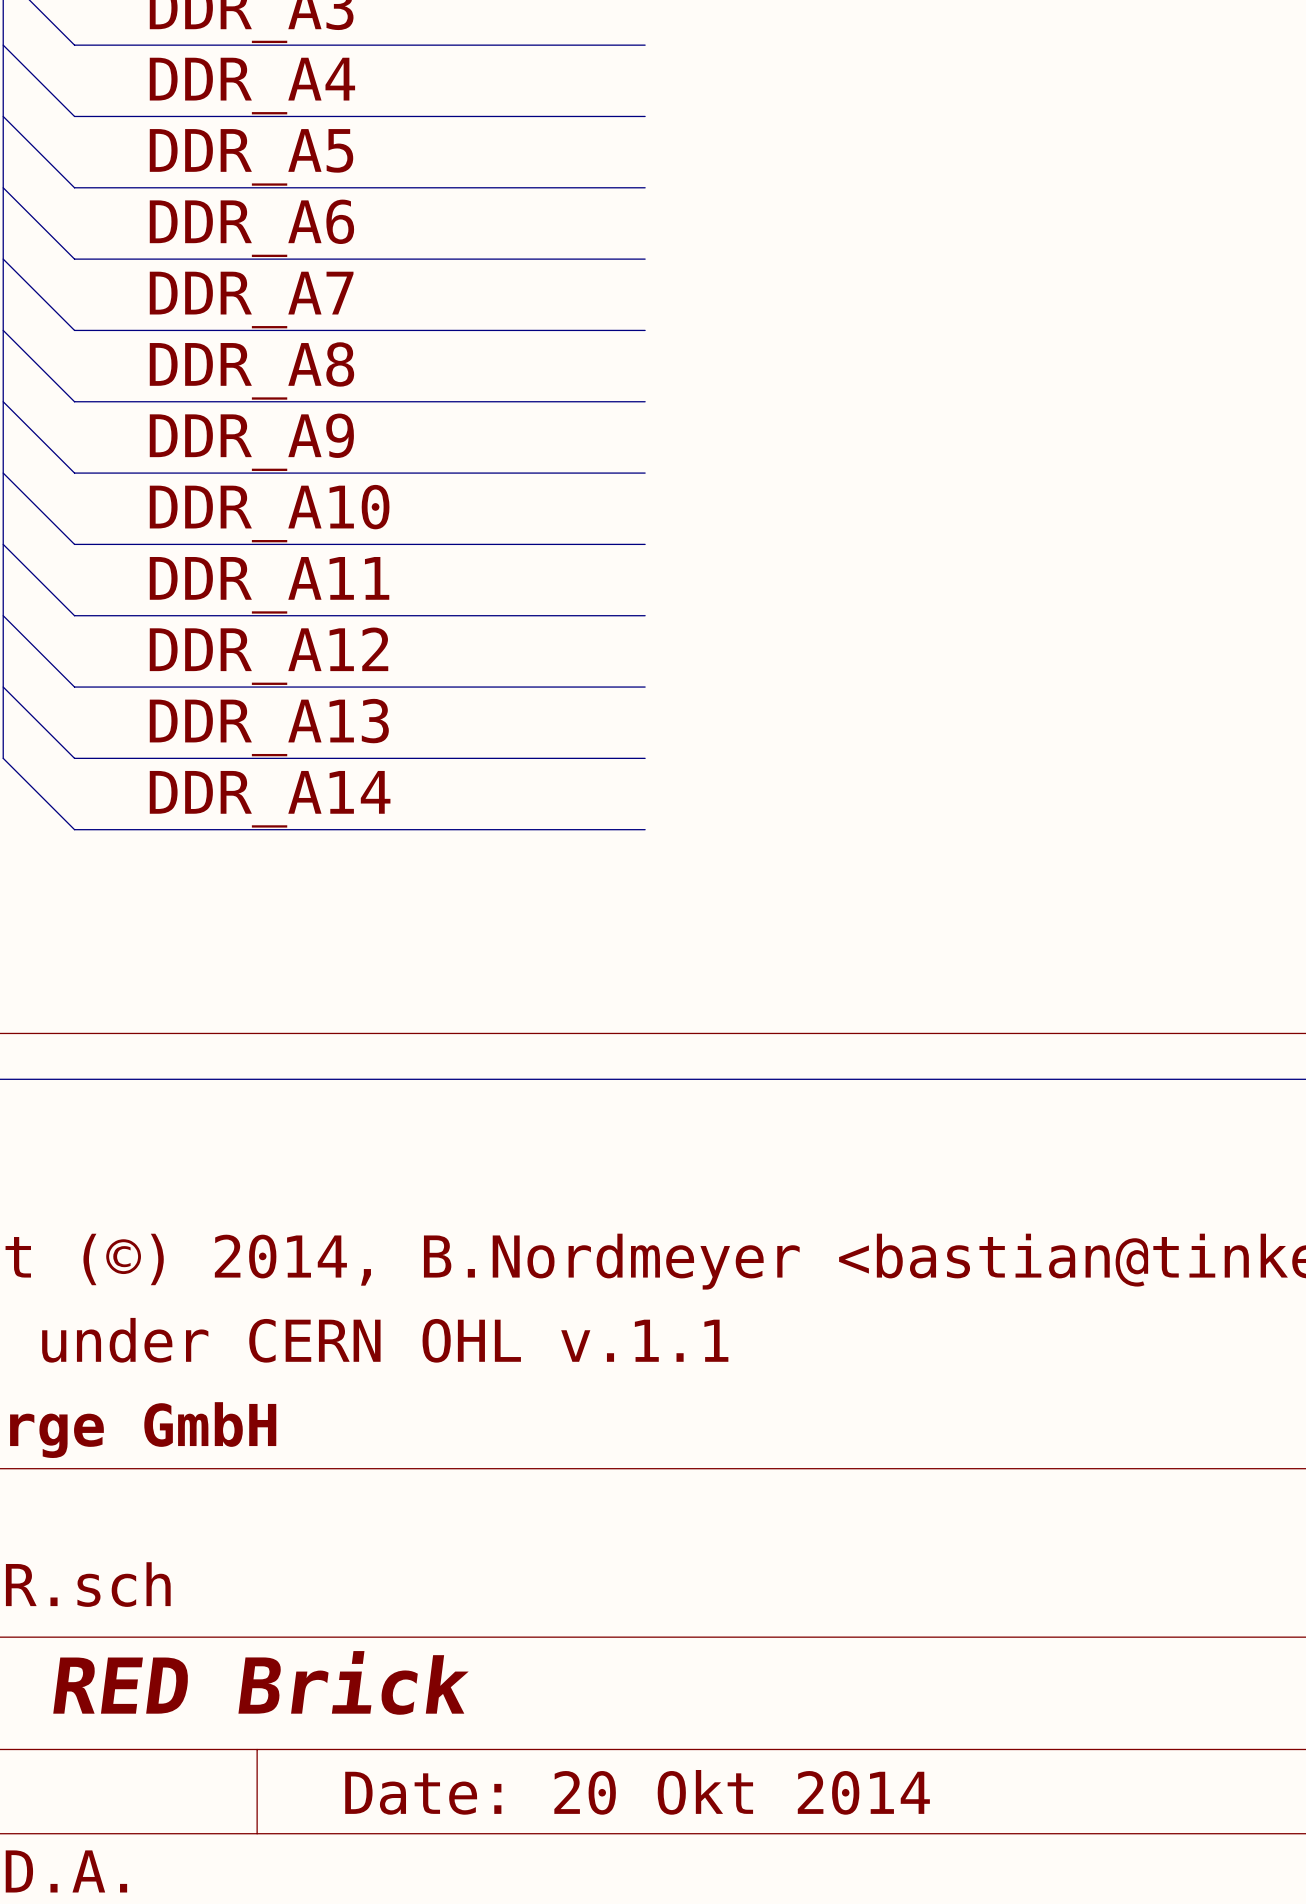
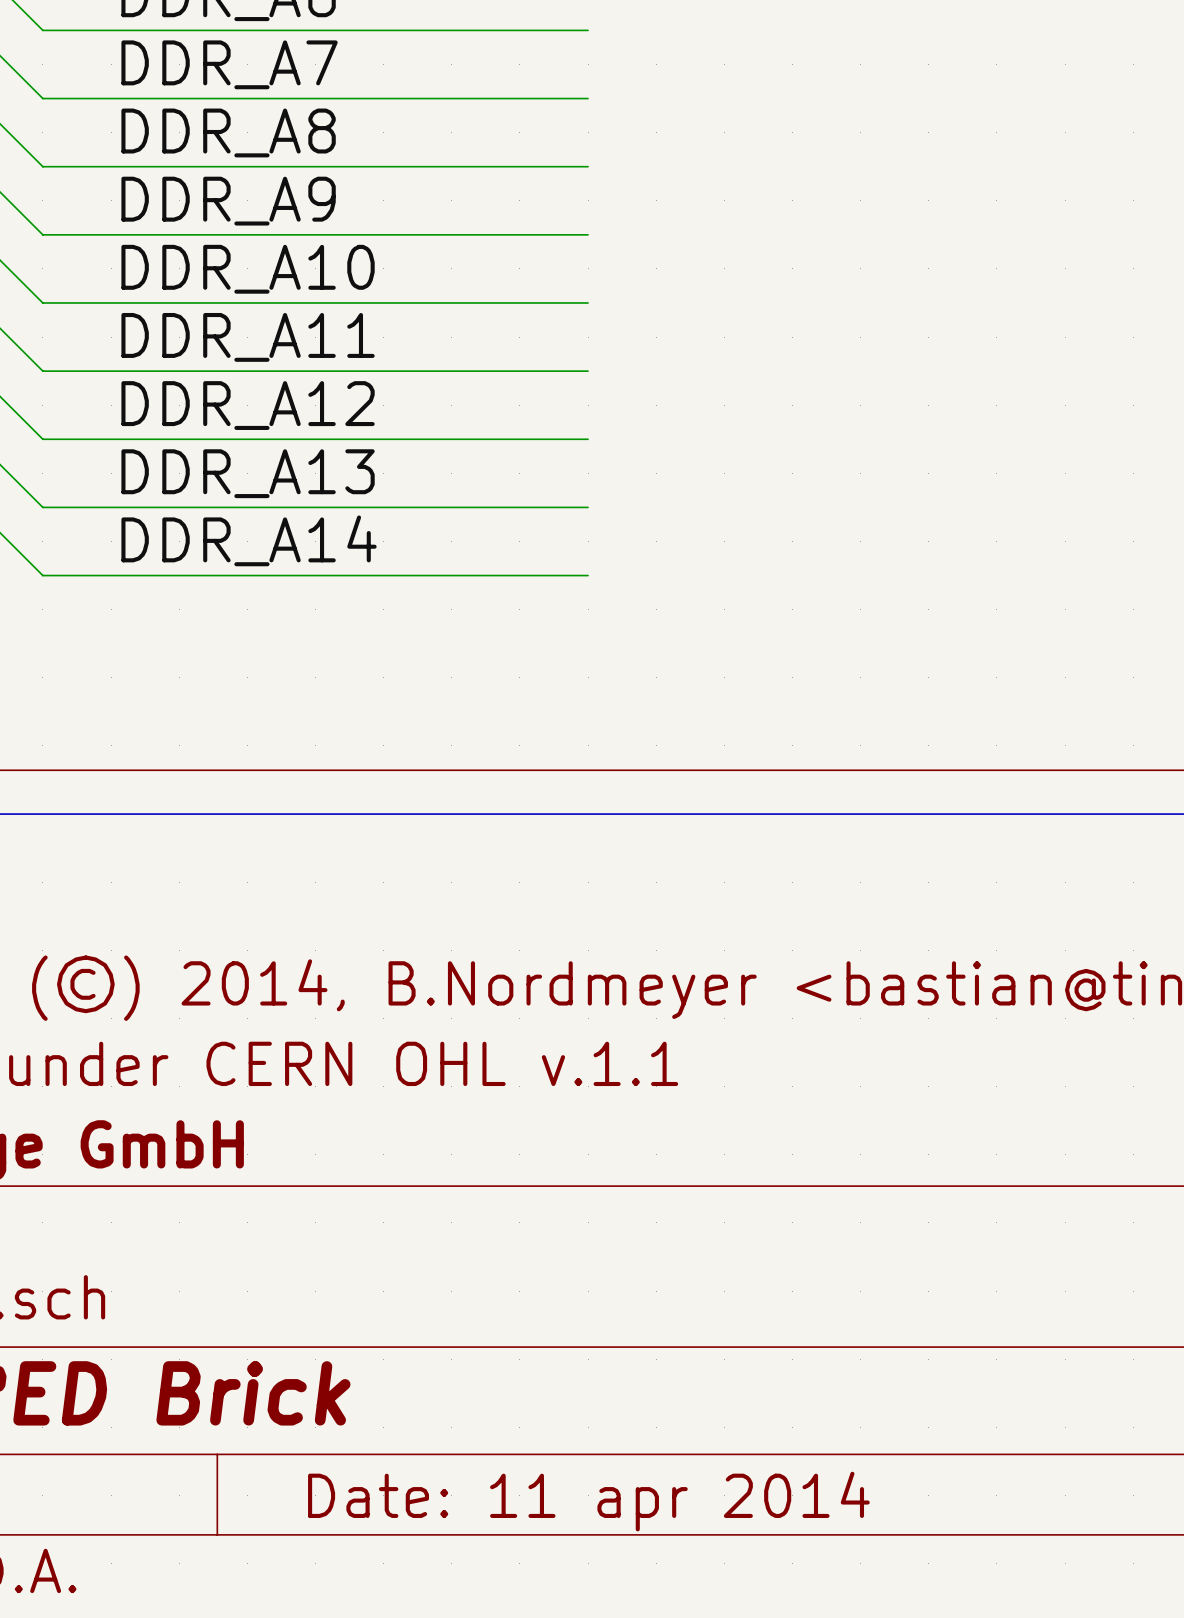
title block: Date: 20 Okt 2014 (637, 1792) -> Date: 11 apr 2014 (588, 1501)

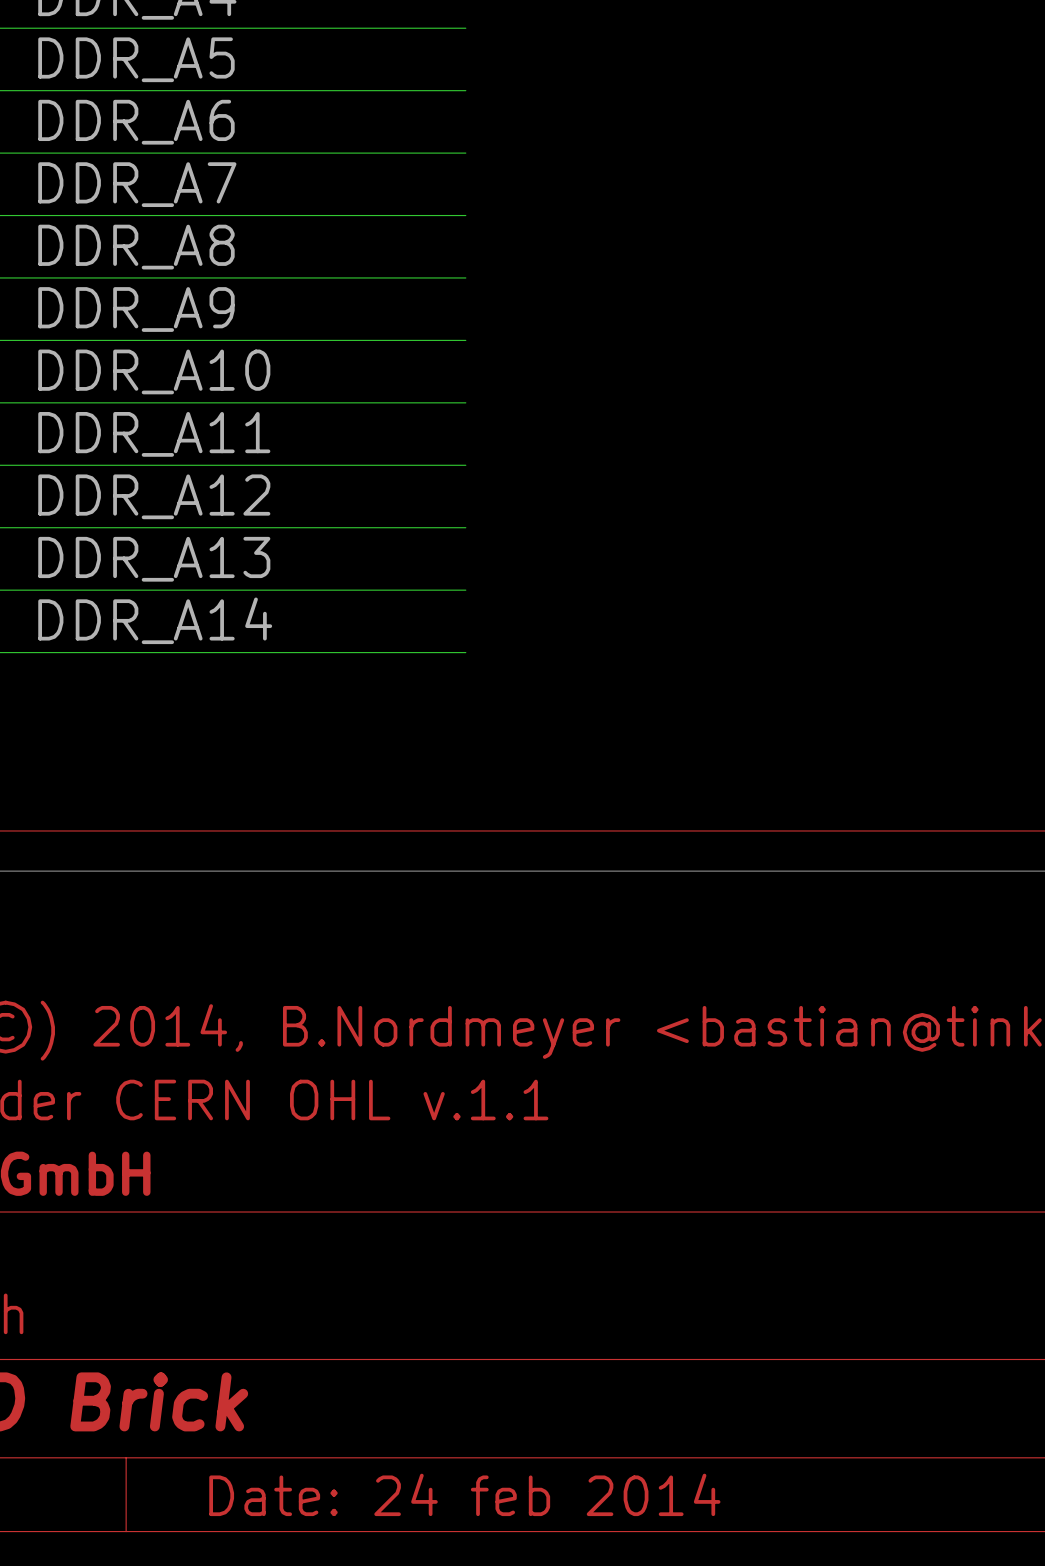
title block: Date: 11 apr 2014 (588, 1501) -> Date: 24 feb 2014 (464, 1494)

